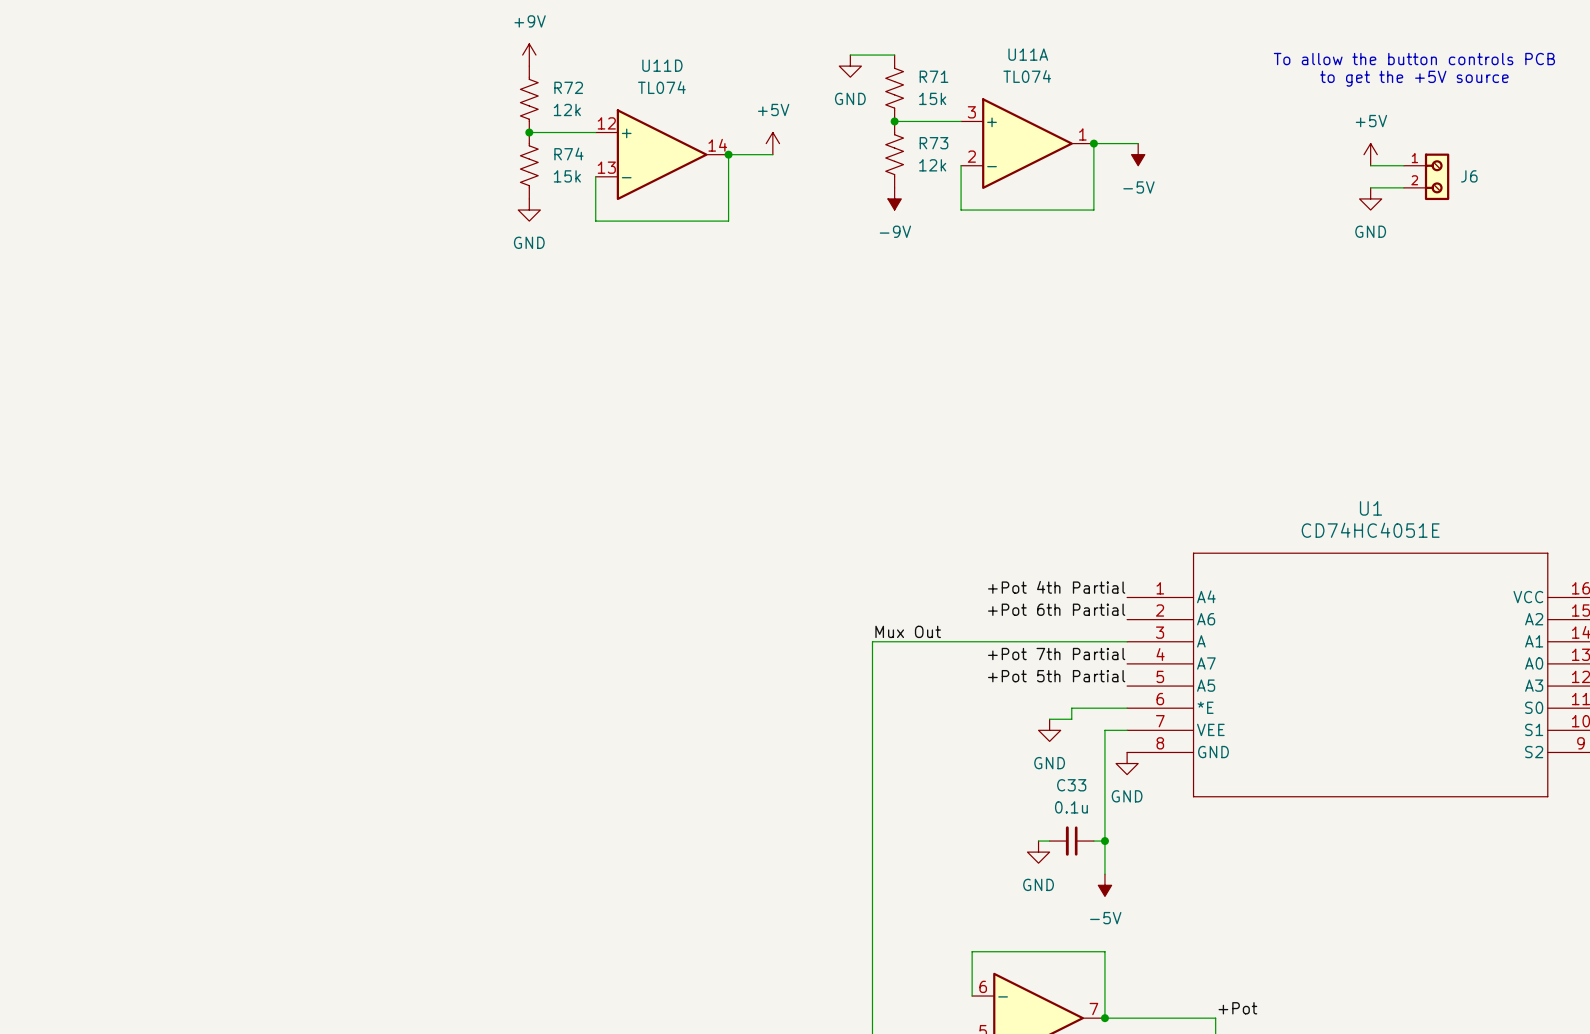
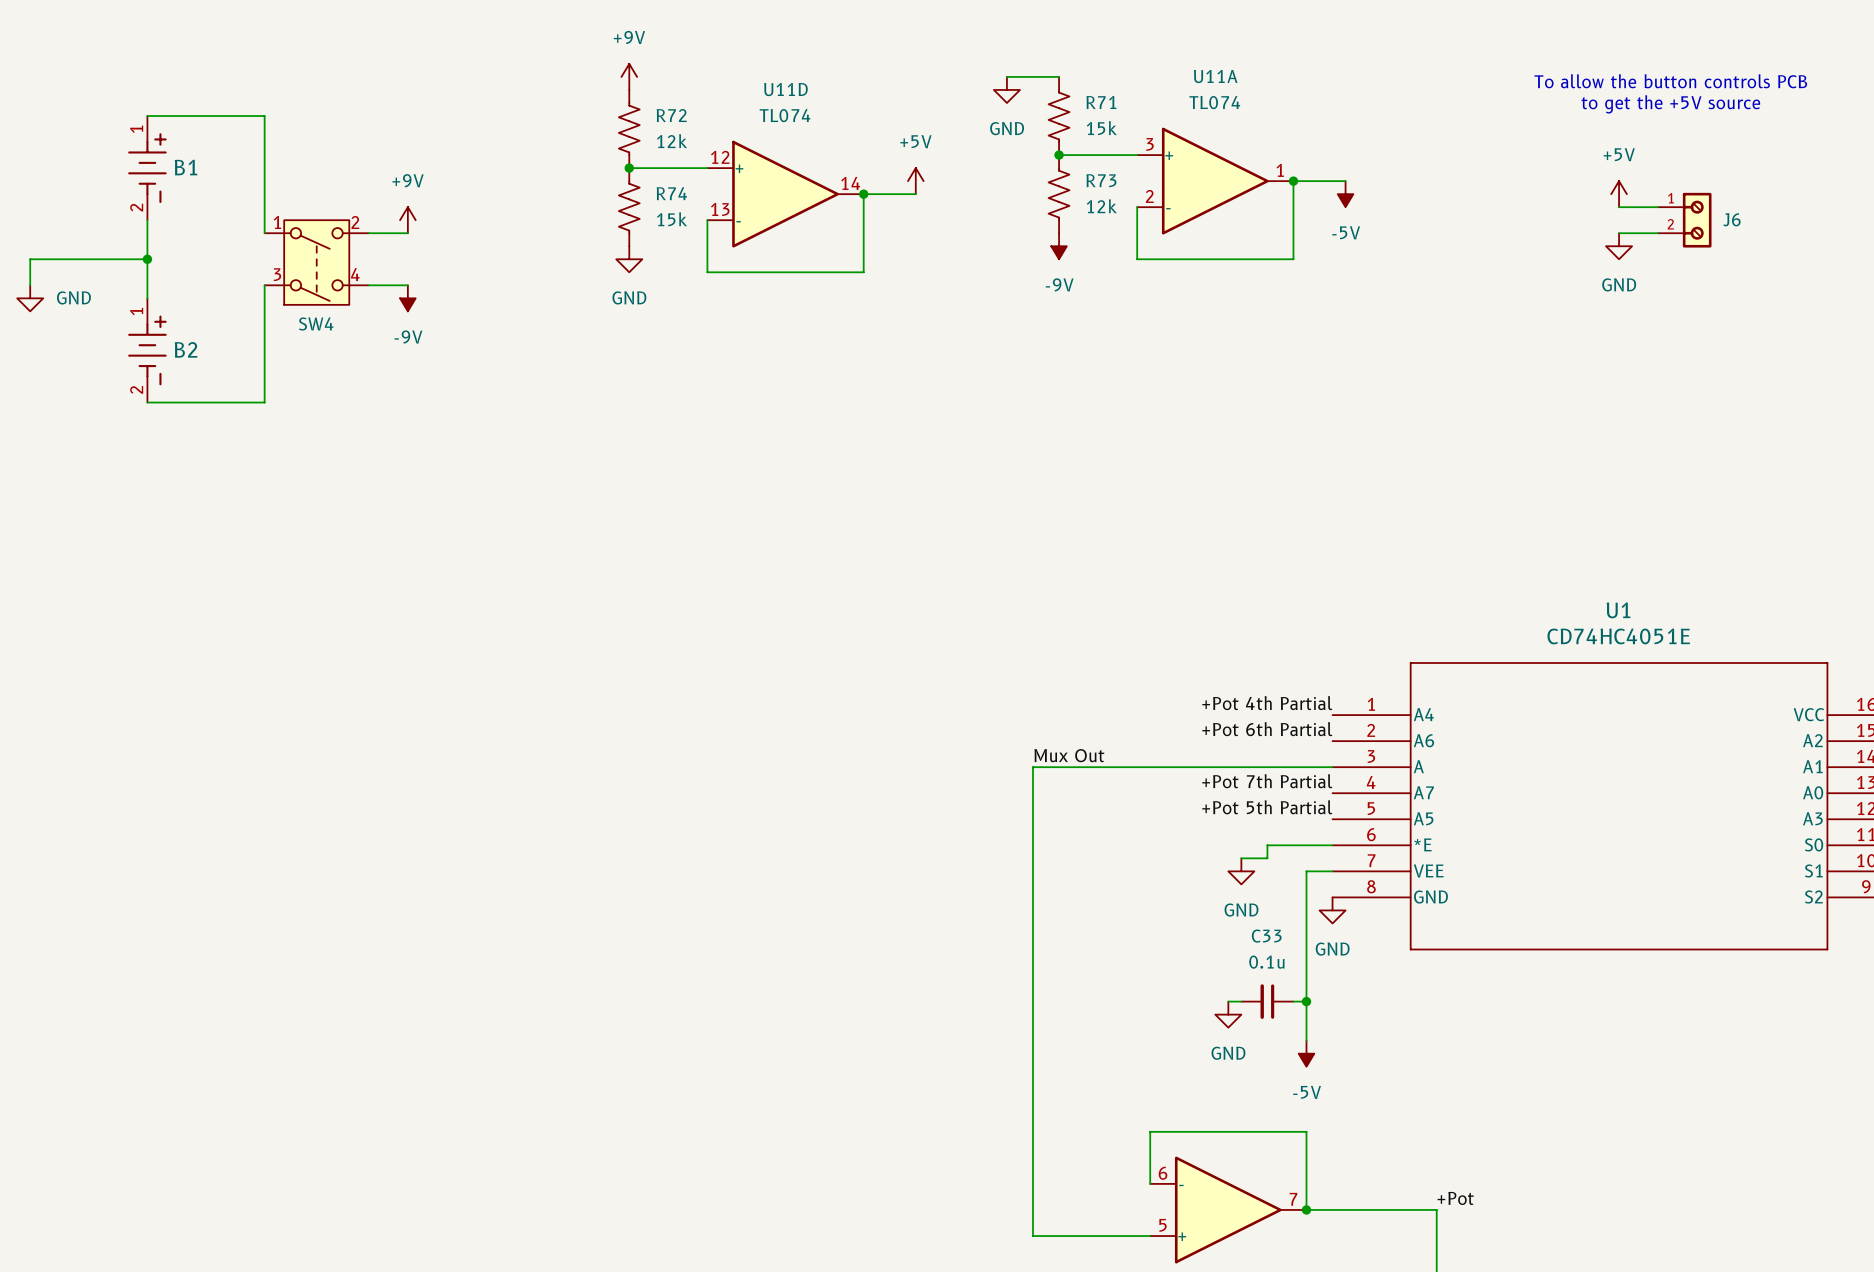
wire: none -> (147, 116) (264, 116) (264, 233)
B1: none -> (147, 168)
wire: none -> (147, 220) (147, 298)
power symbol: none -> +9V (407, 220)
wire: none -> (368, 233) (407, 233)
wire: none -> (147, 259) (30, 259) (30, 285)
junction: none -> (147, 259)
SW4: none -> (316, 262)
wire: none -> (264, 285) (264, 402) (147, 402)
wire: none -> (368, 285) (407, 285)
power symbol: none -> GND (30, 298)
power symbol: none -> -9V (407, 298)
B2: none -> (147, 350)

